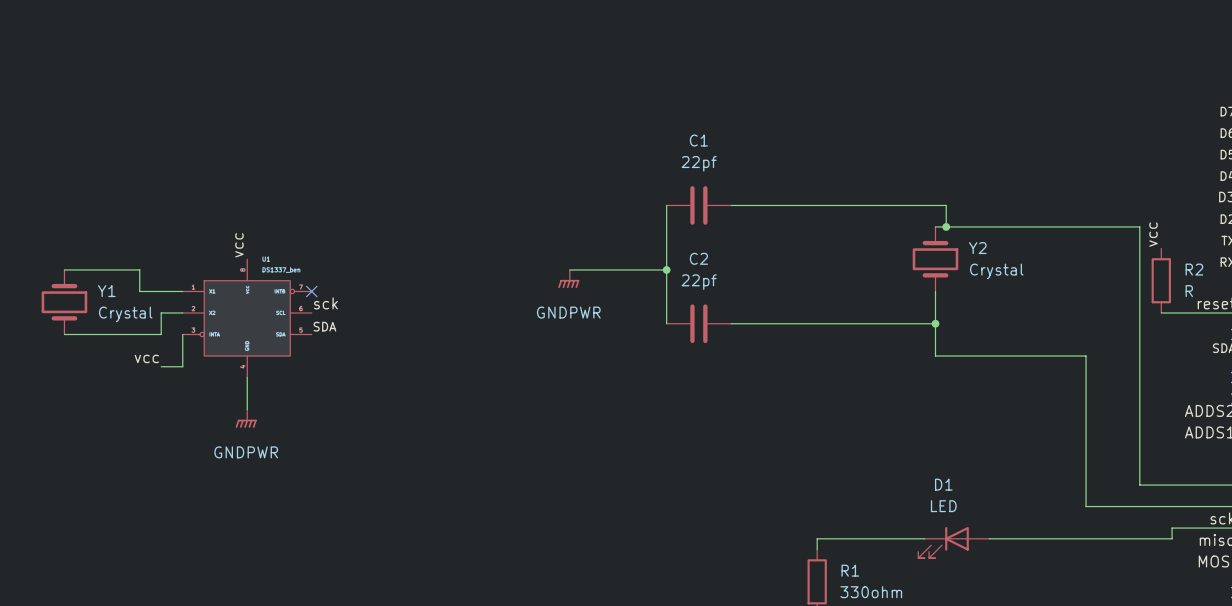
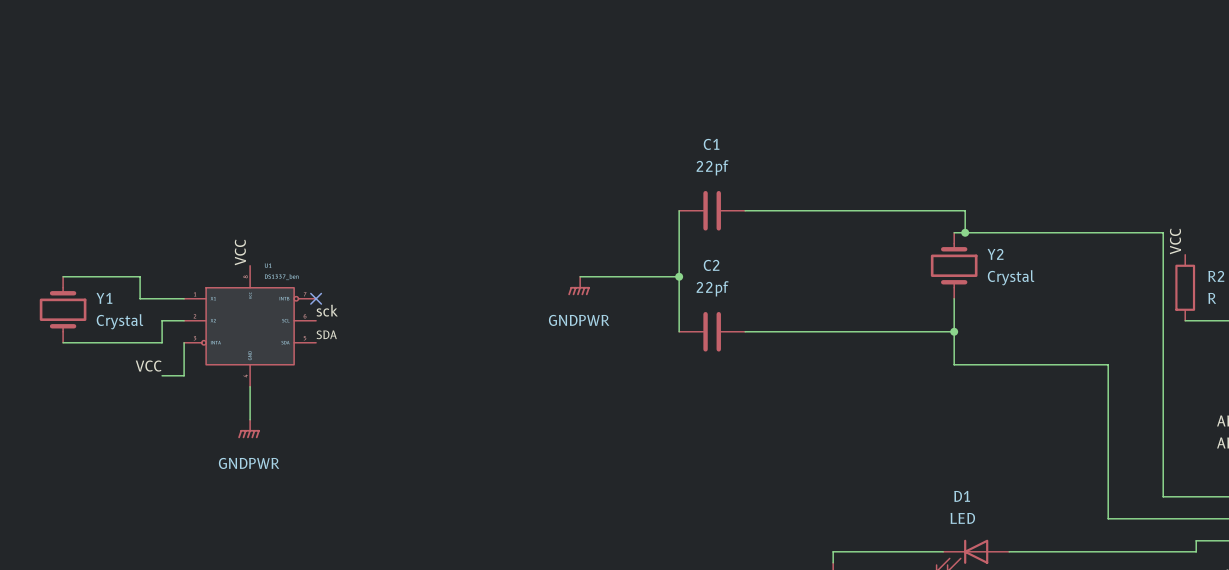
label: vcc (1153, 234) -> VCC (1175, 241)
label: vcc (239, 245) -> VCC (240, 252)
label: vcc (146, 358) -> VCC (148, 366)

